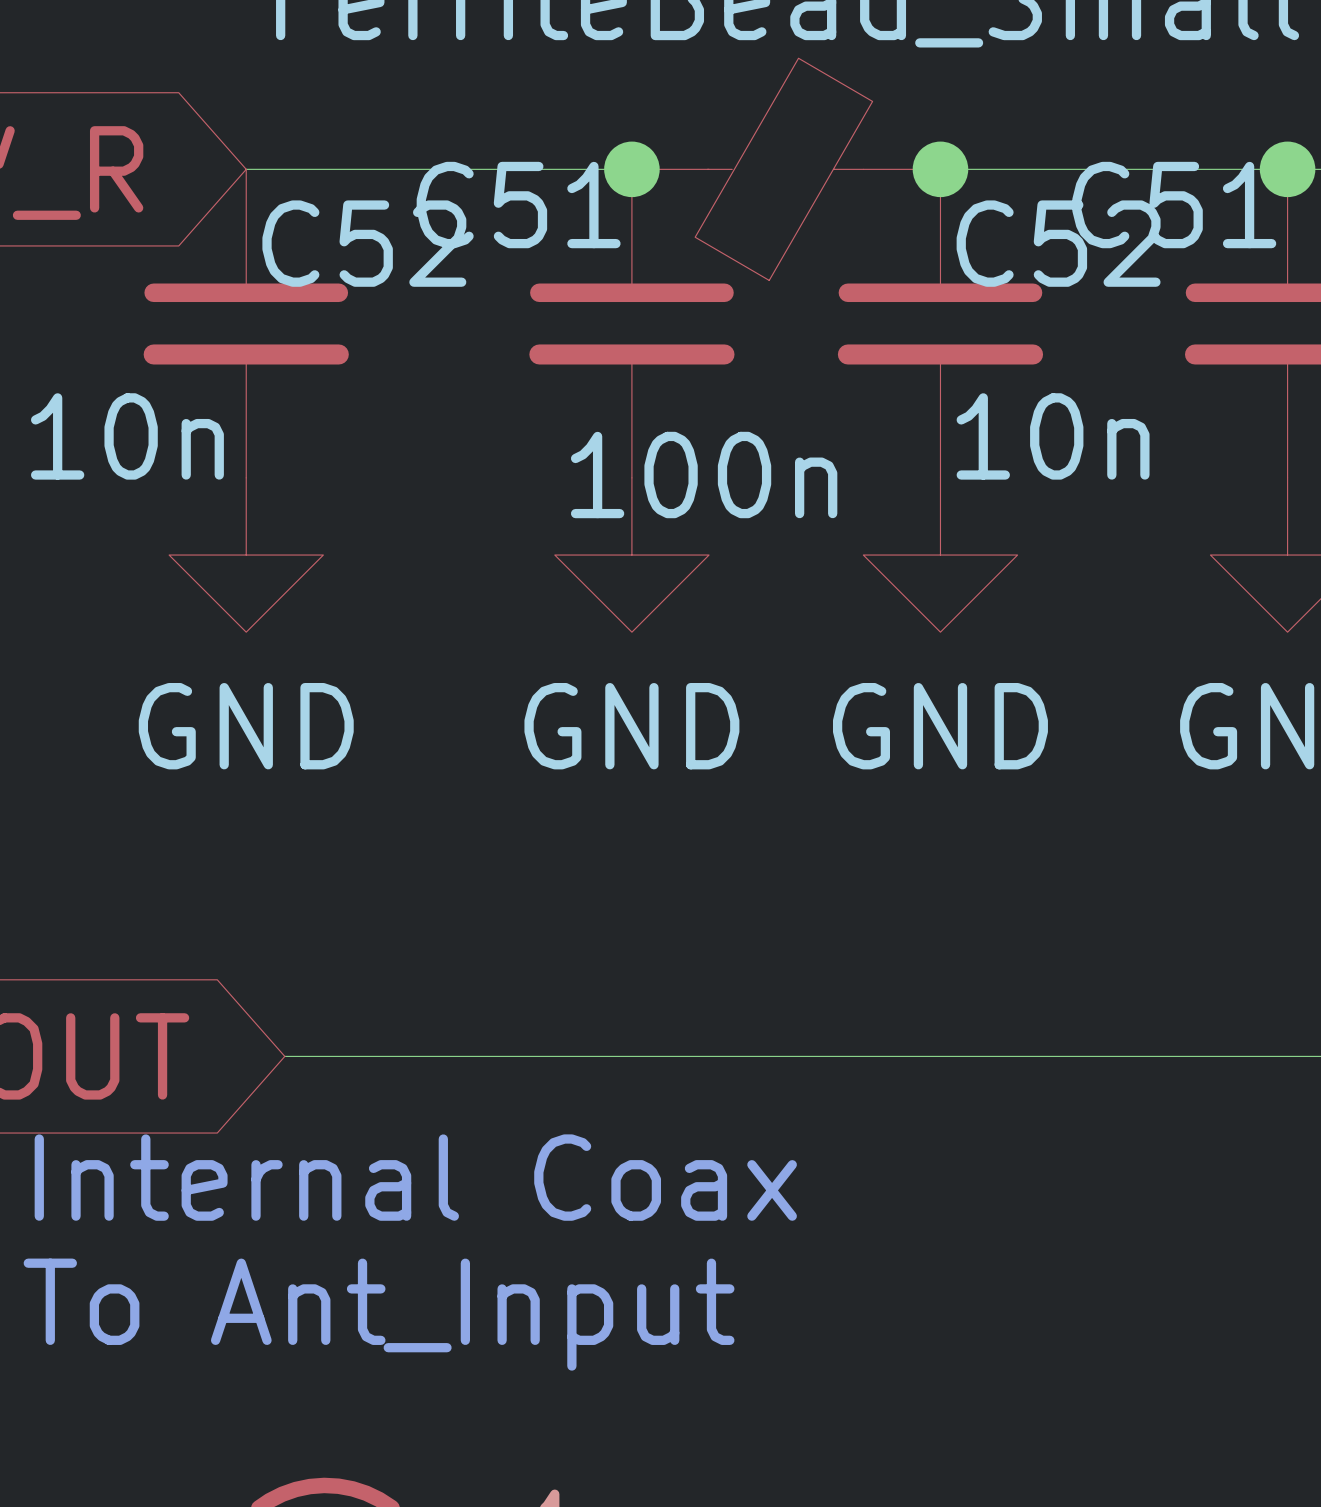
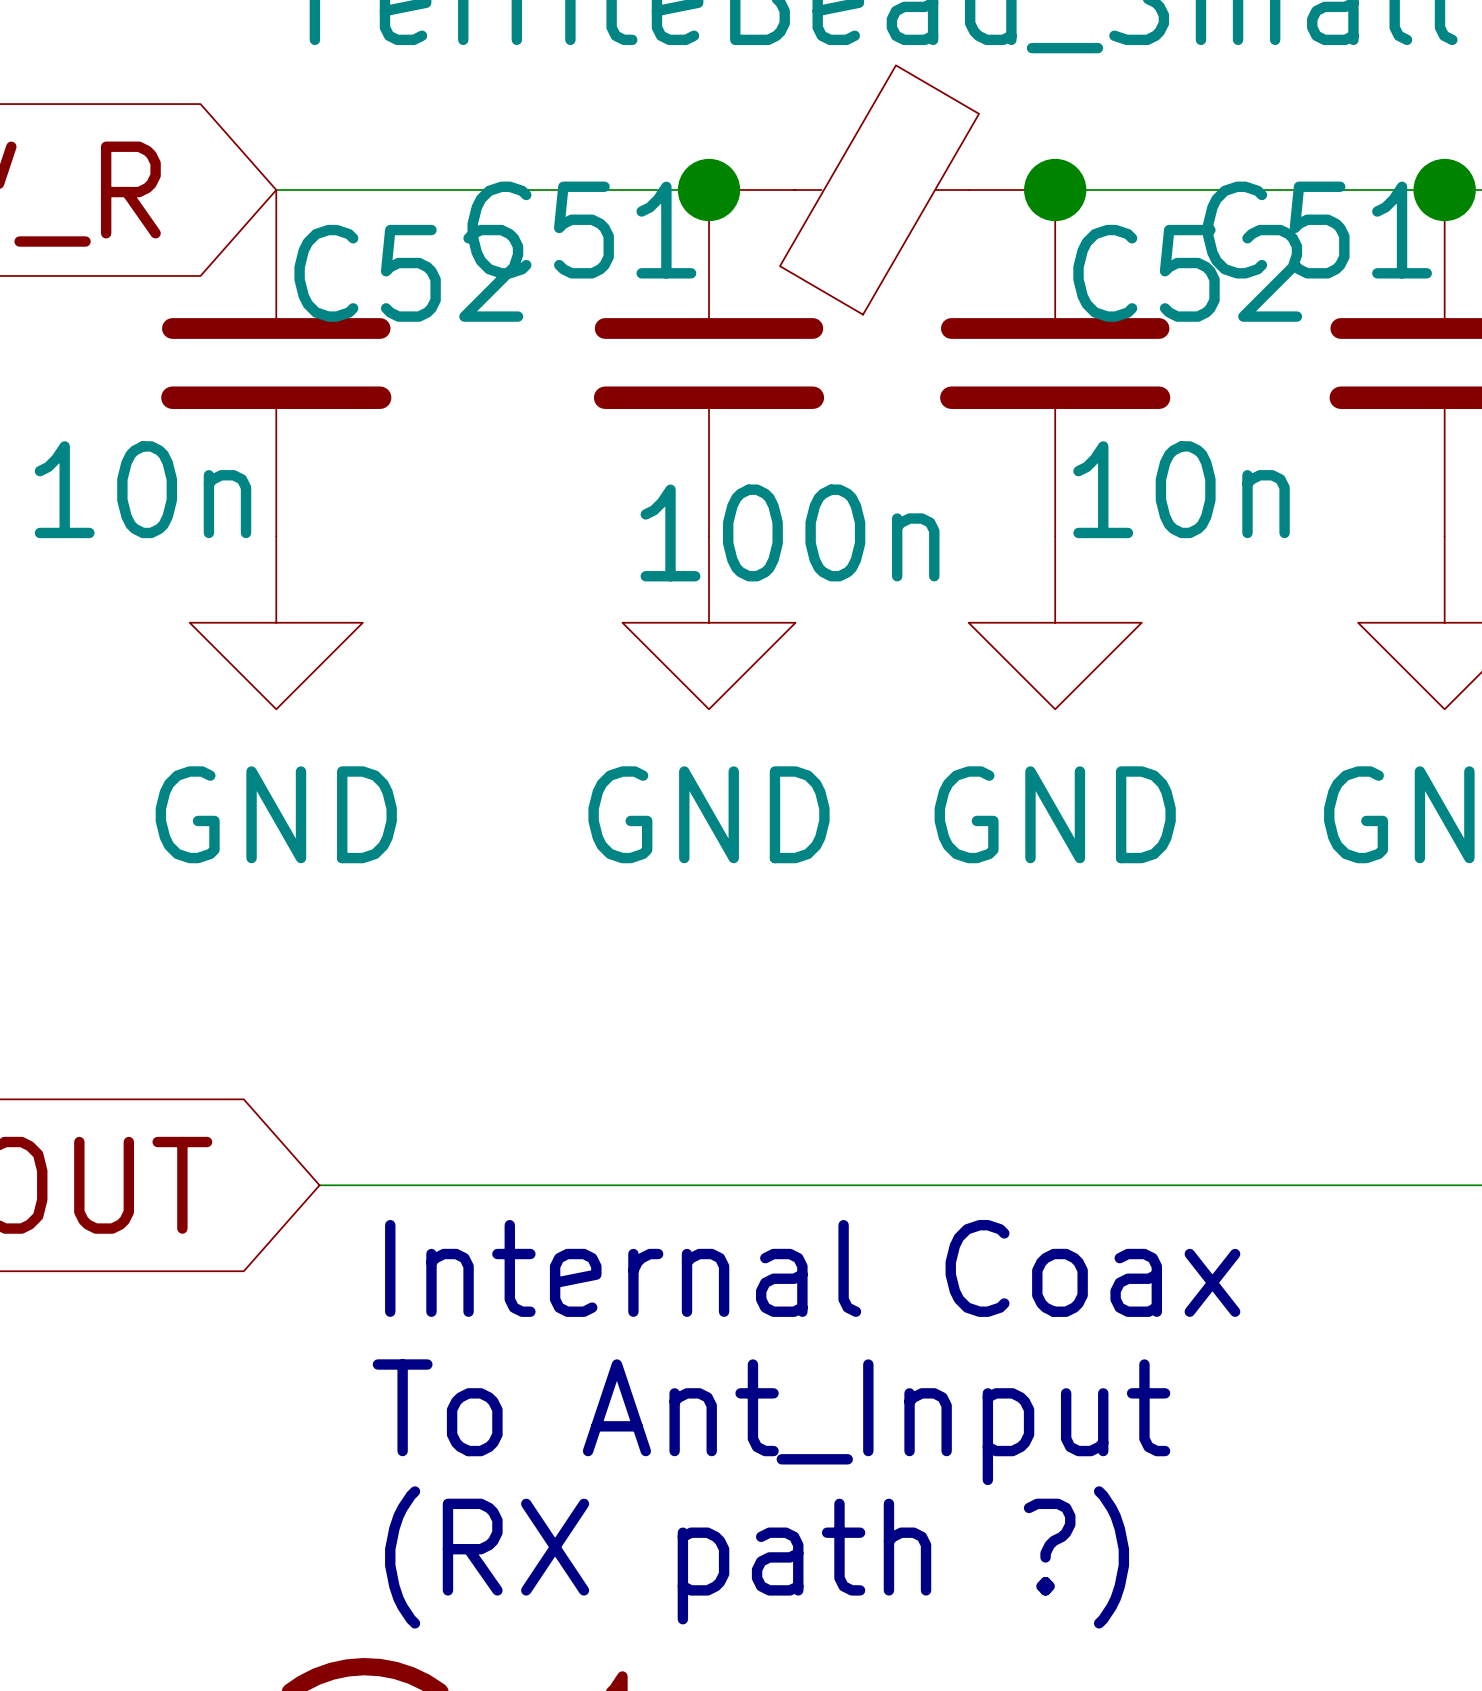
text position: Internal Coax (415, 1177) -> Internal Coax (812, 1268)
text position: To Ant_Input (379, 1314) -> To Ant_Input (771, 1422)
text: none -> (RX path ?) (757, 1557)

